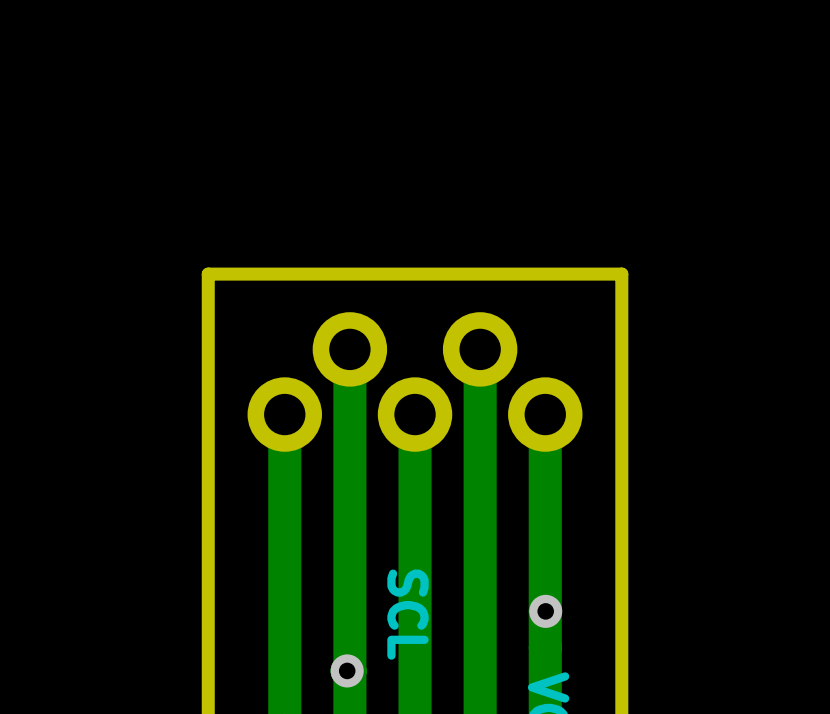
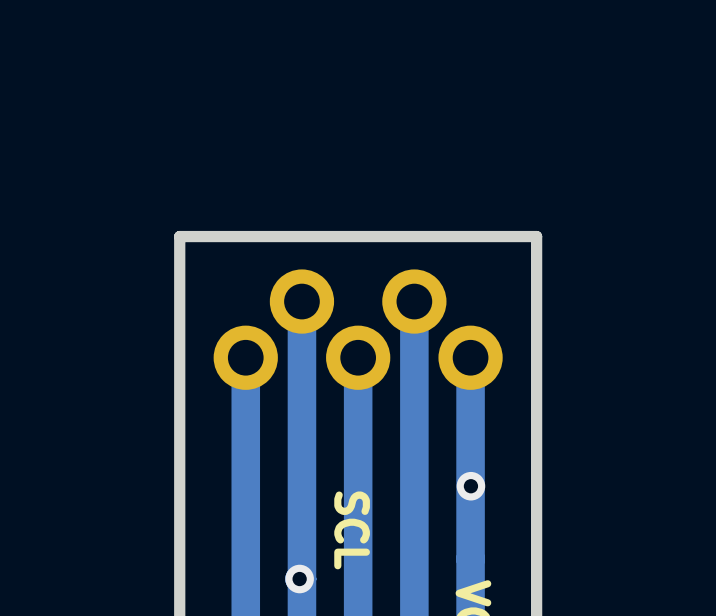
via position: (545, 611) -> (470, 486)

